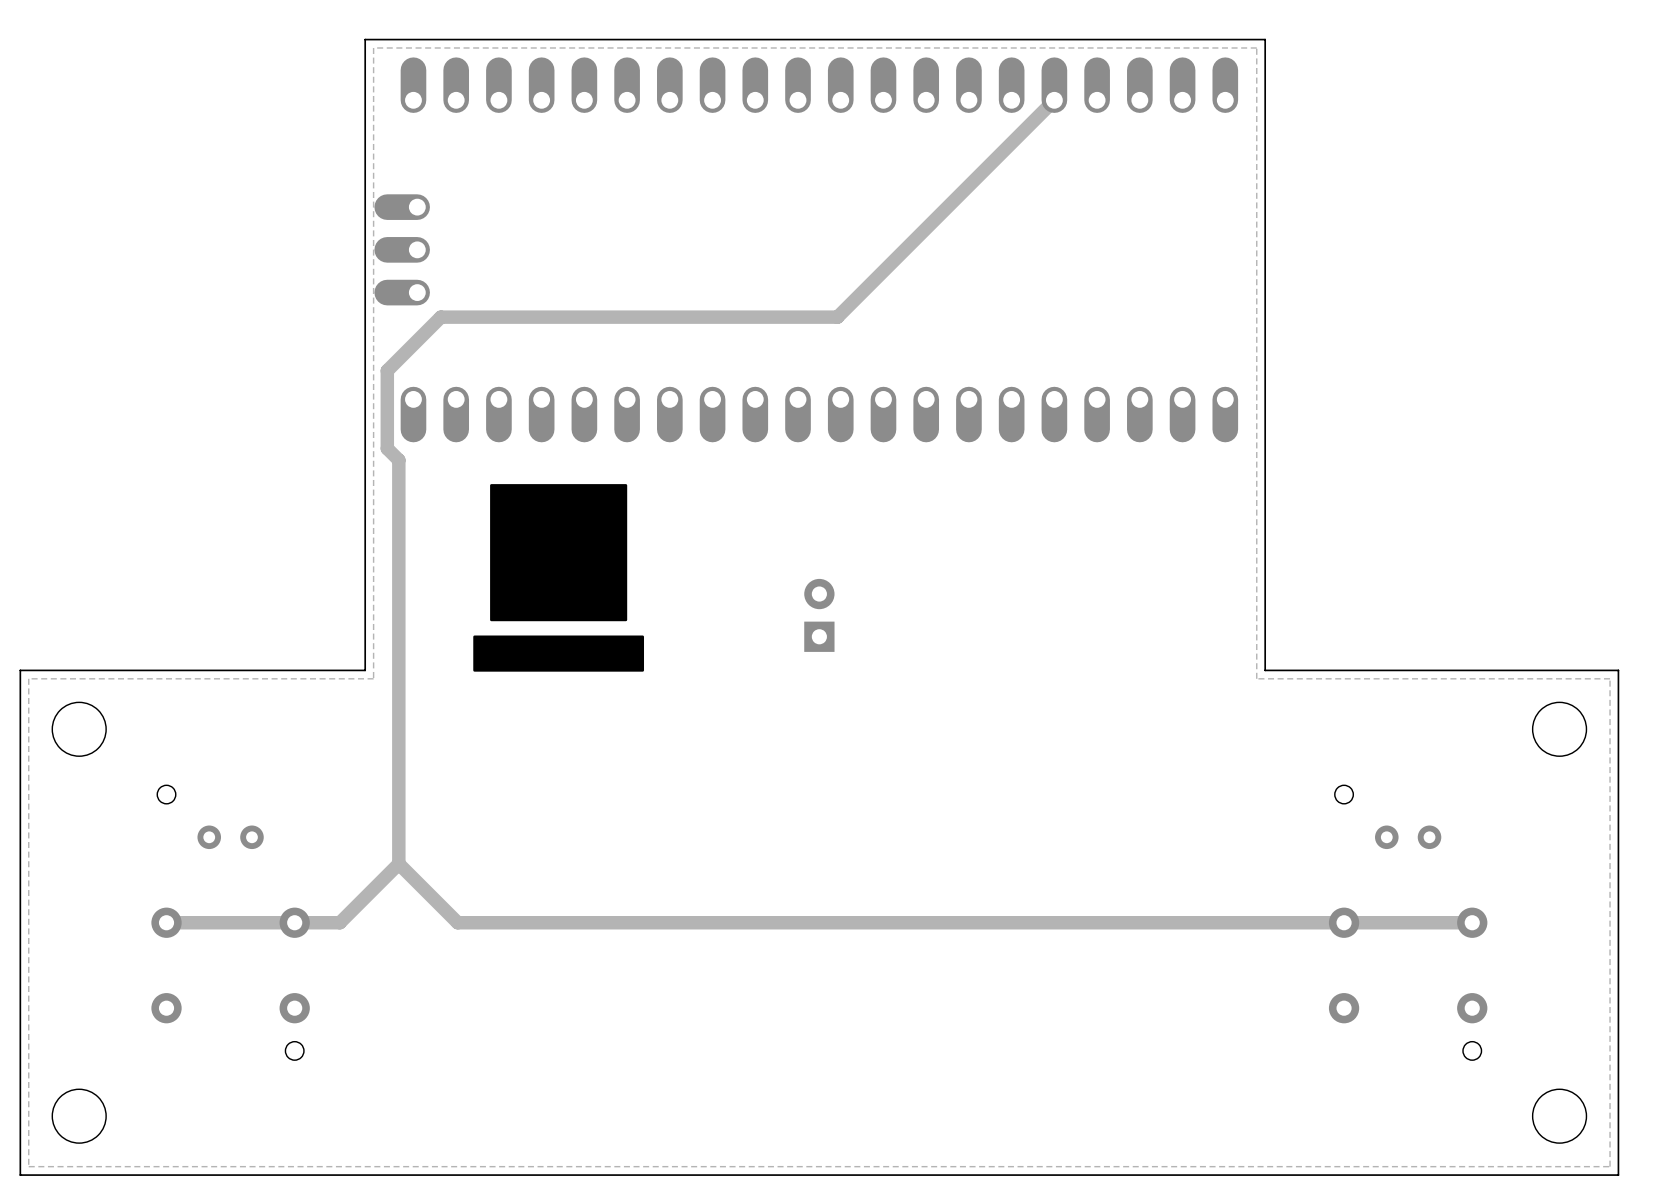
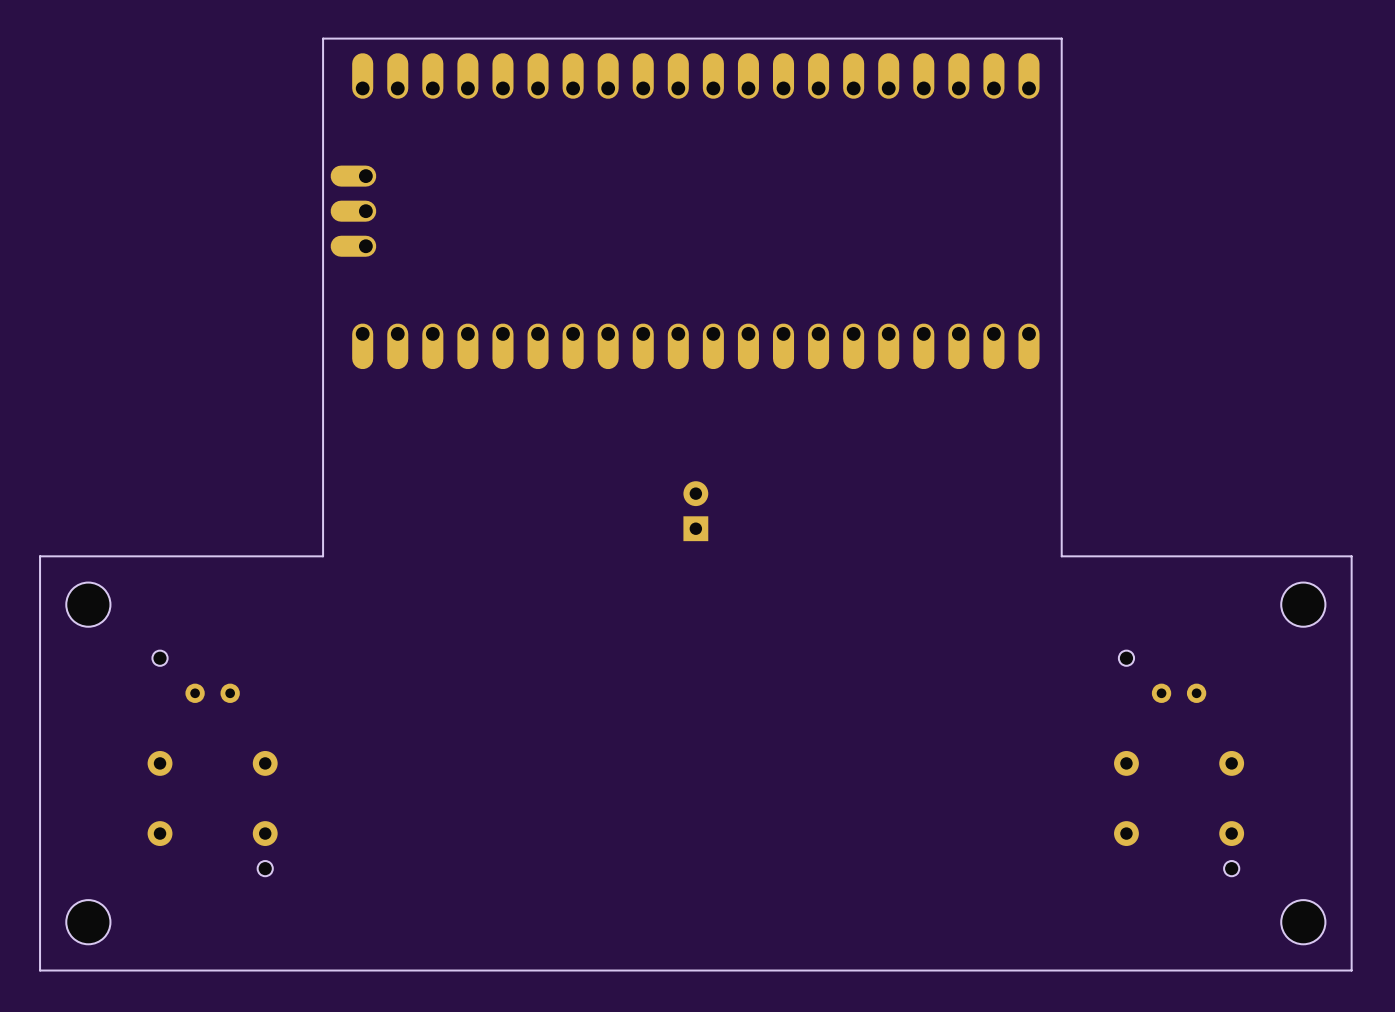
zone outline: (1256, 47) (1256, 678) (1610, 678) (1610, 1166) (28, 1166) (28, 678) (373, 678) (373, 47) (1256, 47) -> none
track: (1054, 100) (837, 317) (440, 317) (387, 370) (387, 448) (398, 460) (398, 863) -> none
drawing: [473, 484, 645, 672] -> none
track: (398, 863) (457, 922) (1472, 922) -> none
track: (398, 863) (339, 922) (166, 922) -> none

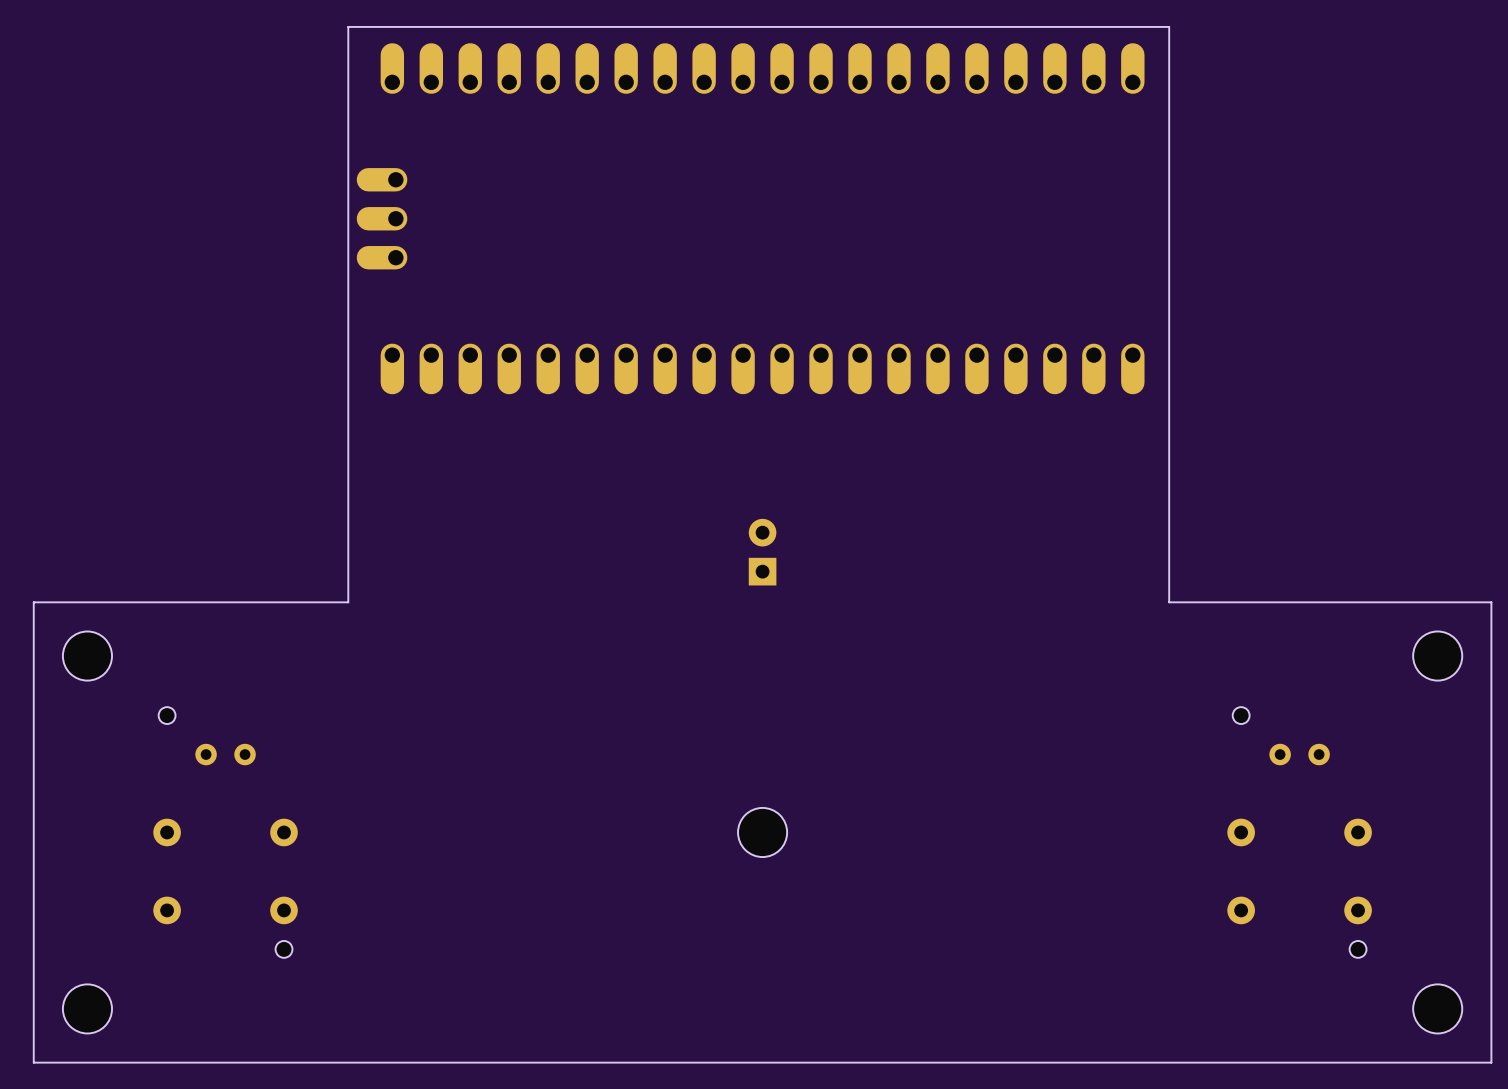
part: none -> (762, 832)

